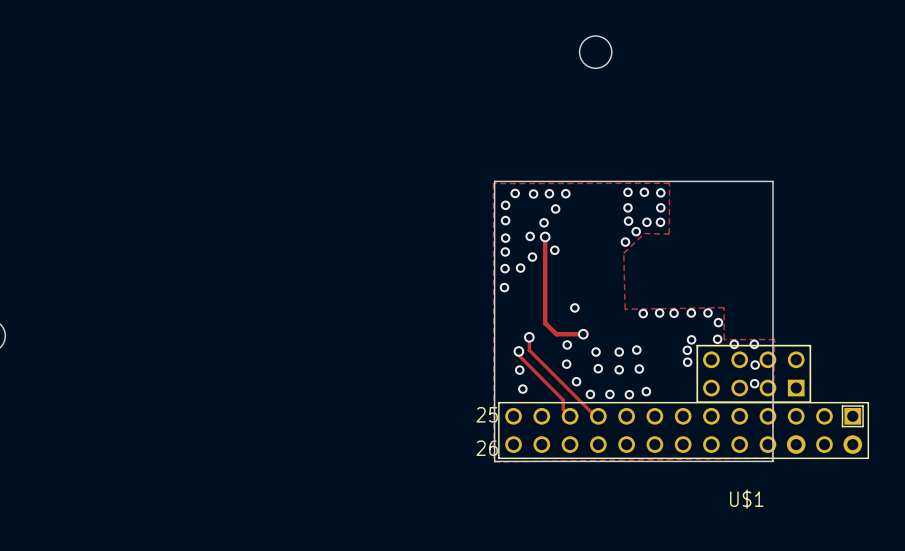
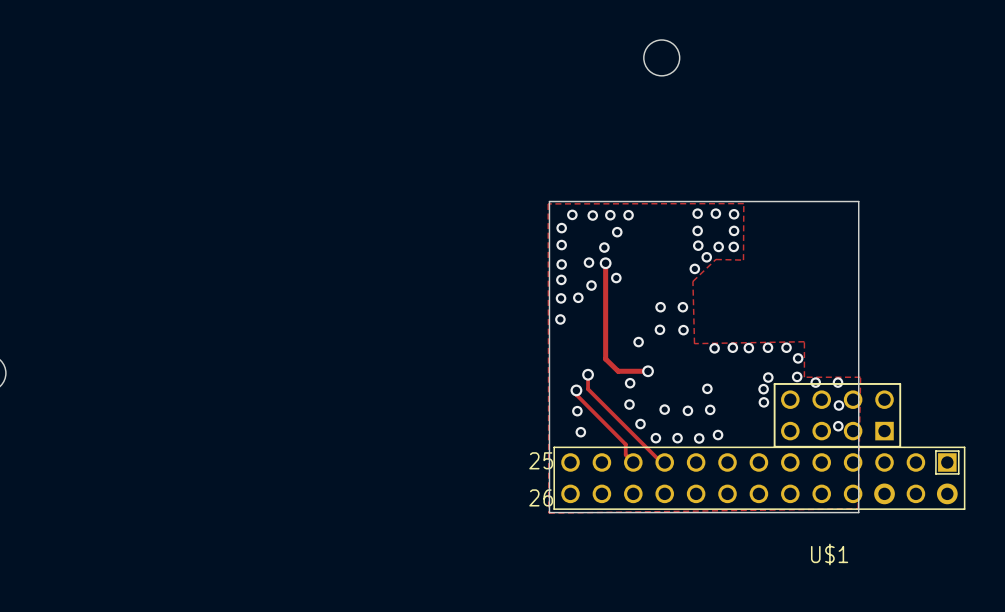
via: none -> (660, 307)
via: none -> (682, 307)
via: none -> (659, 329)
via: none -> (683, 330)
via: (596, 352) -> none
via: (619, 352) -> none

